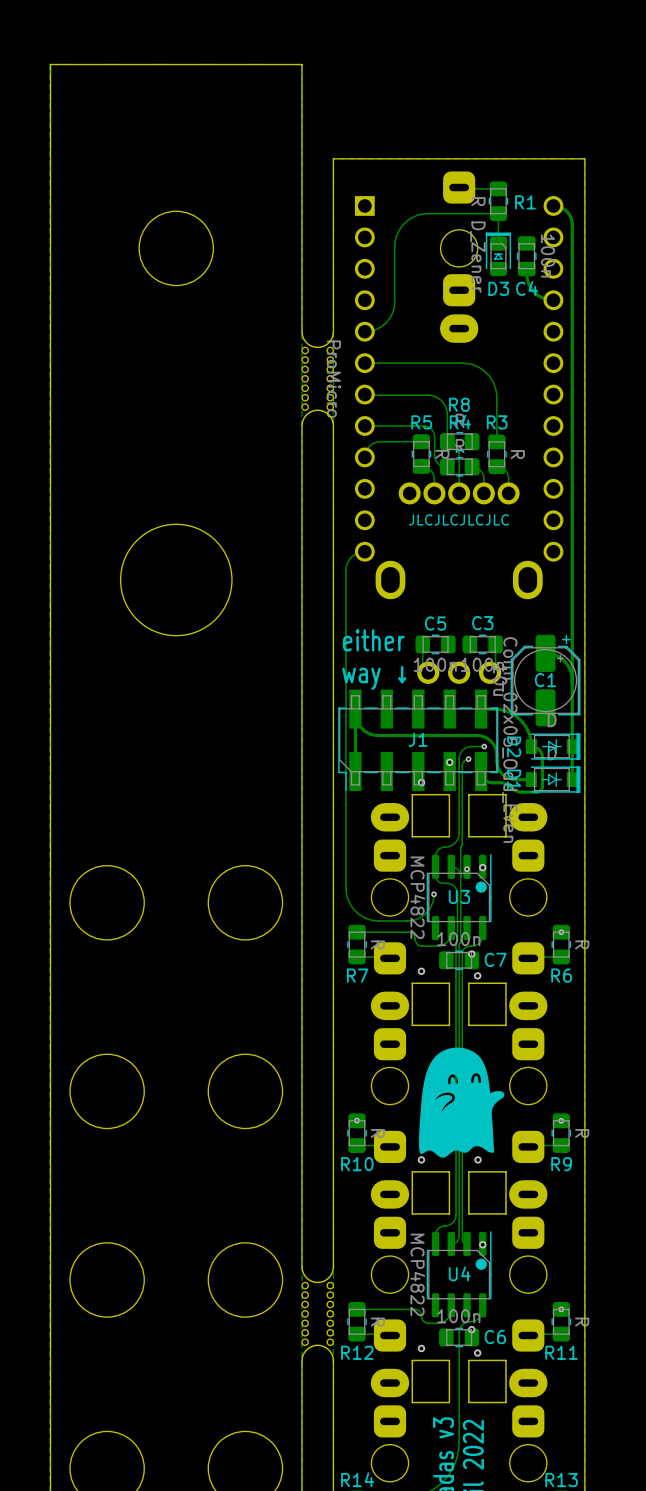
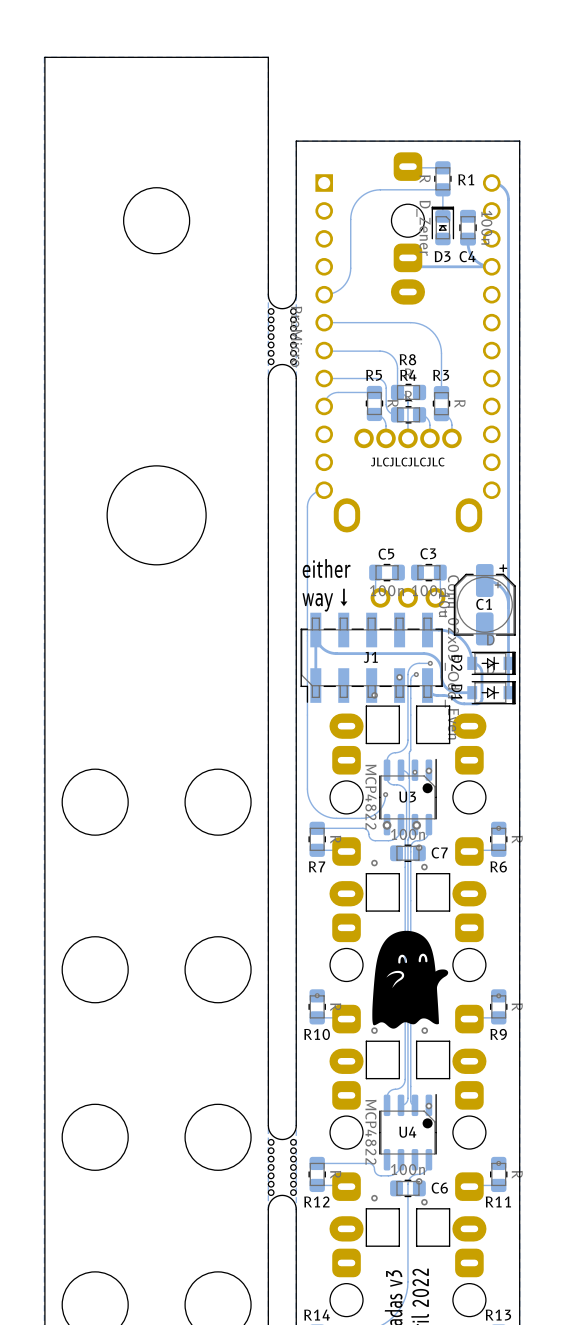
track: none -> (407, 257) (409, 263) (415, 266) (491, 266)
via: none -> (387, 825)
via: none -> (416, 825)

